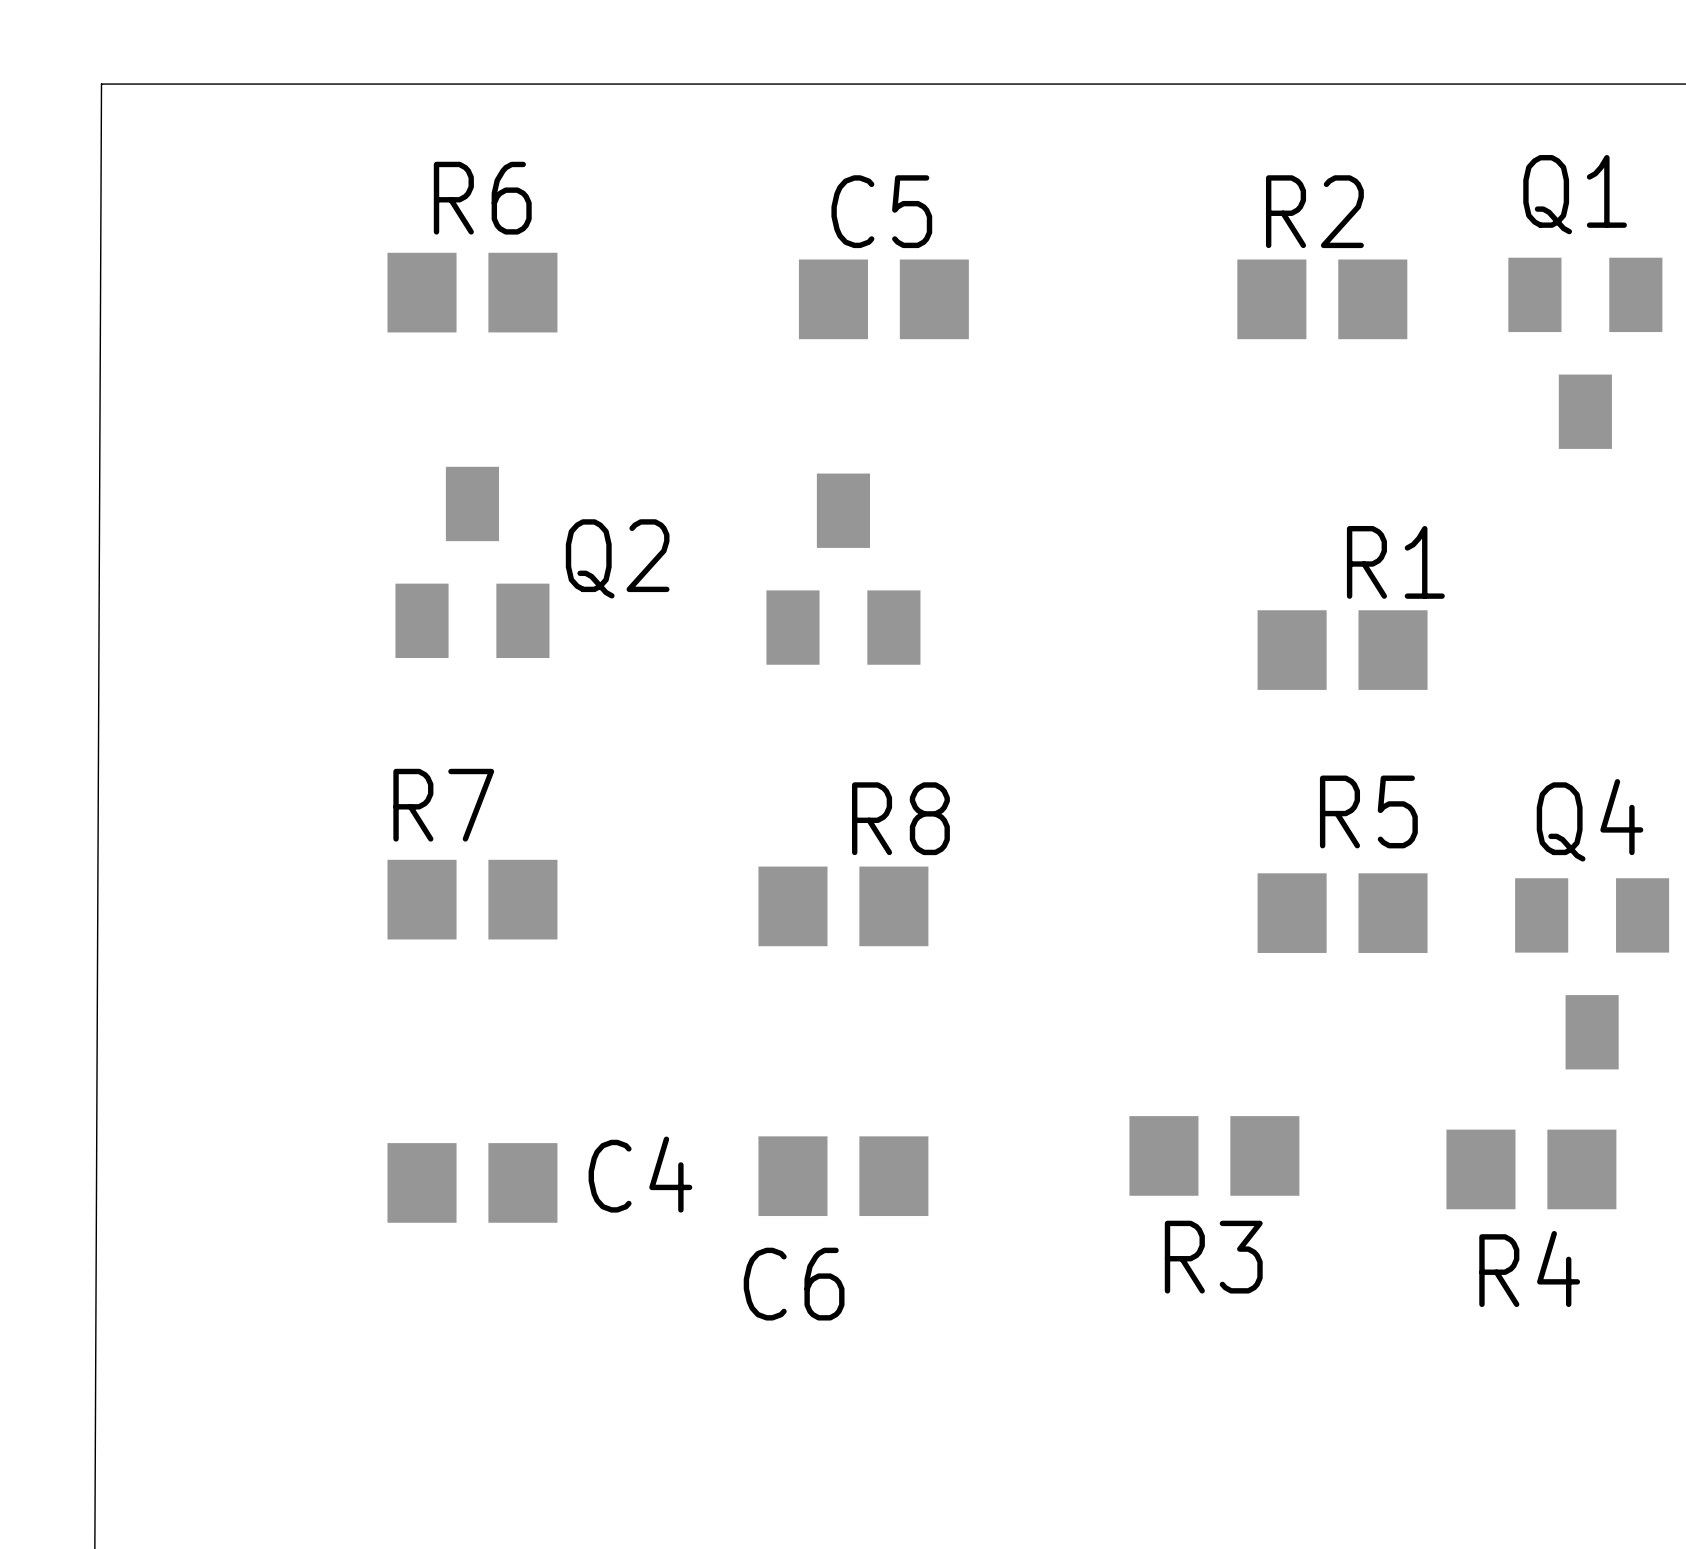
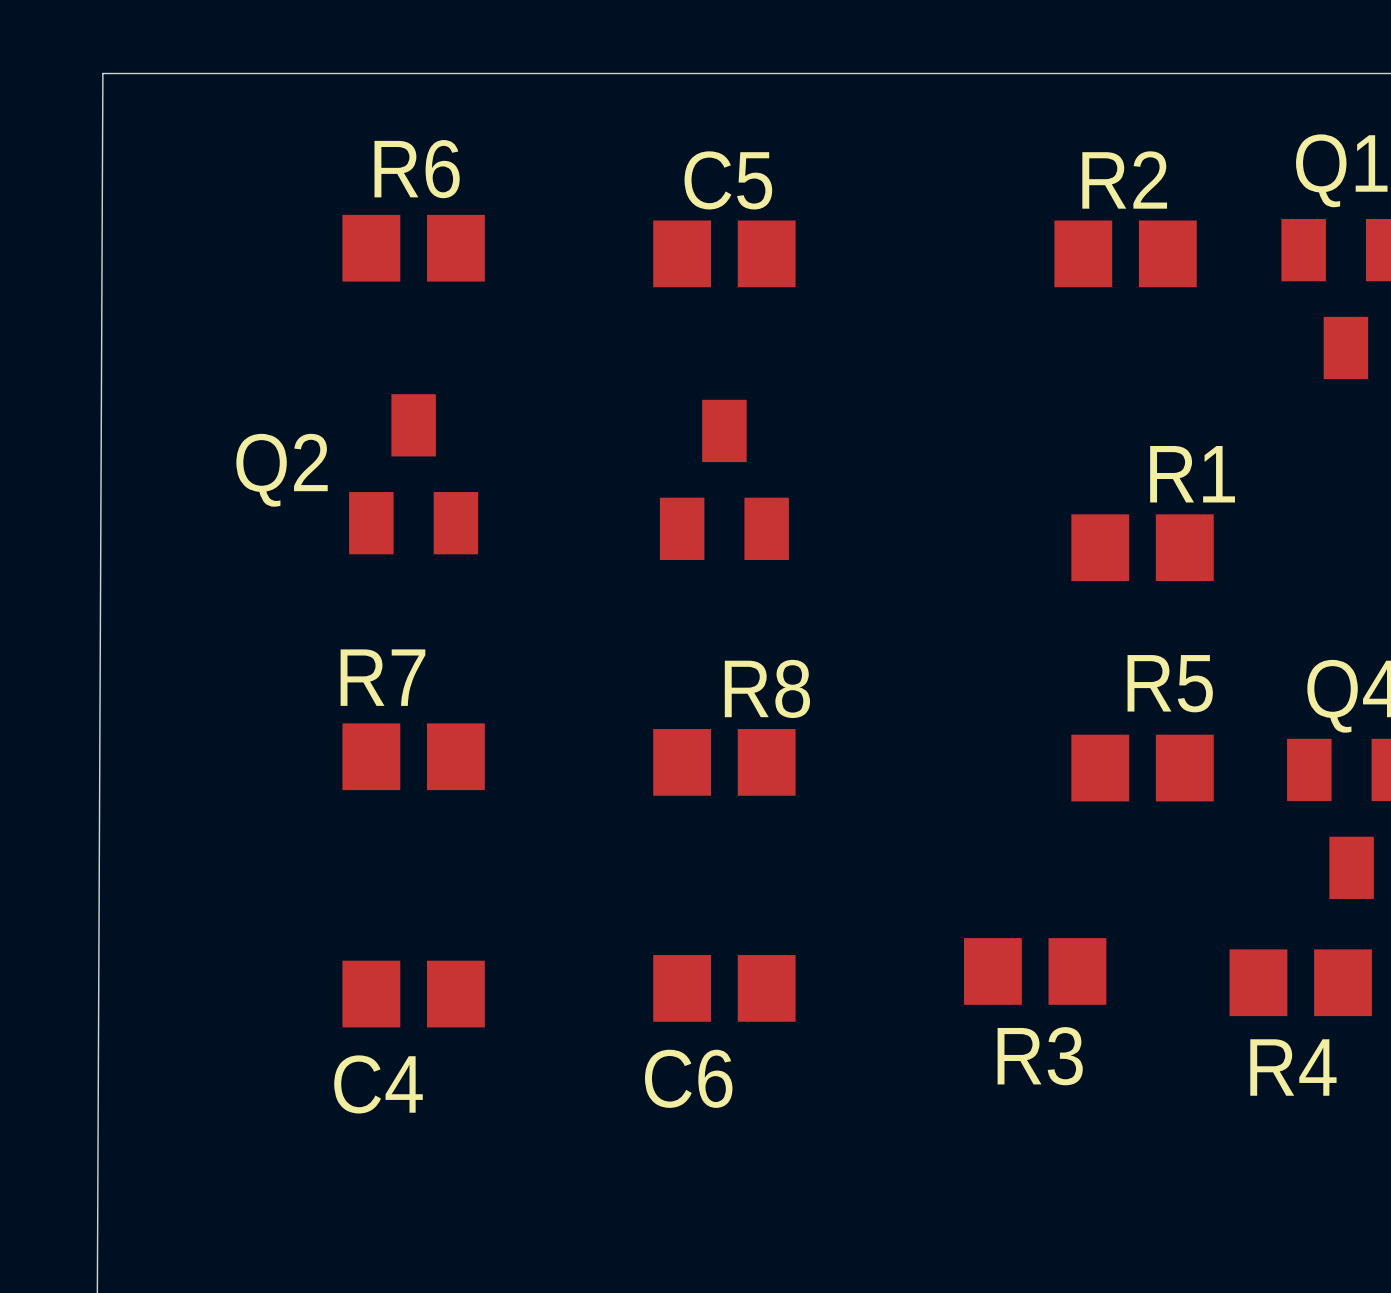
C5 position: (883, 299) -> (724, 253)
Q2 name position: Q2 (617, 558) -> Q2 (282, 470)
C4 name position: C4 (640, 1174) -> C4 (378, 1084)

